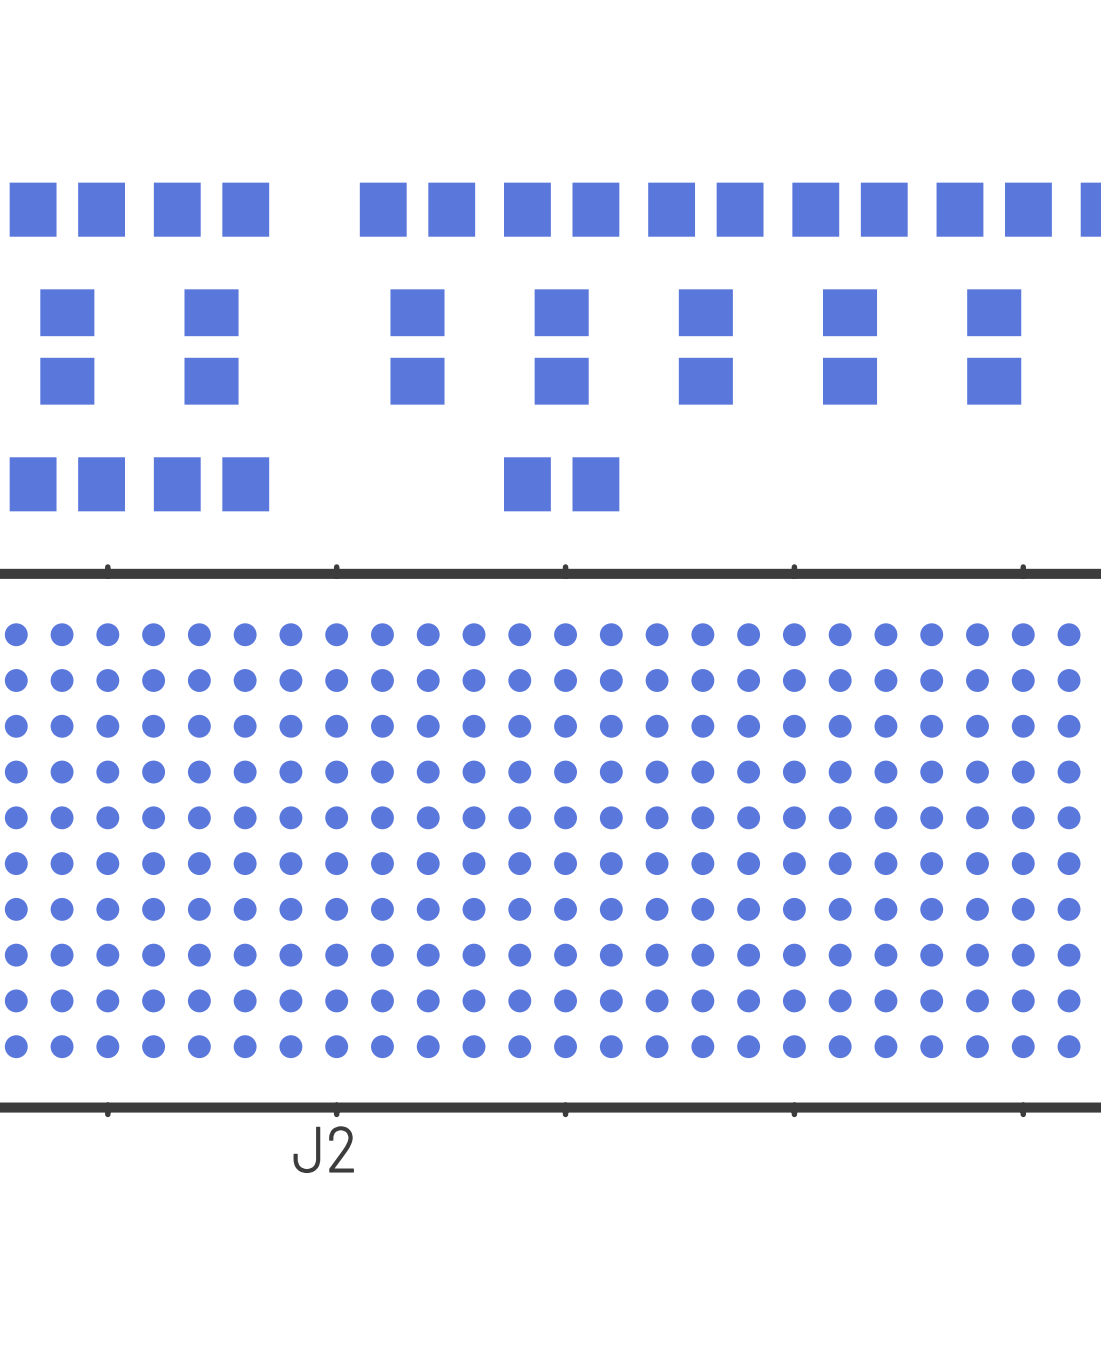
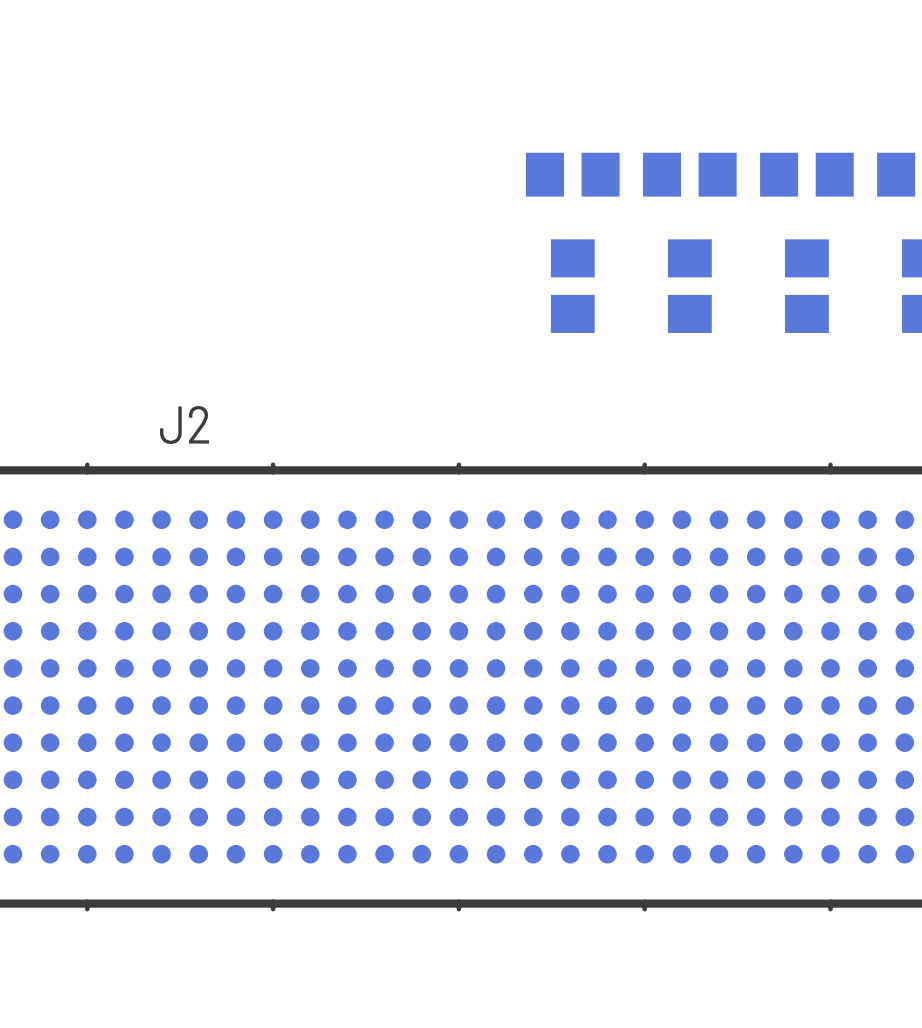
part: (67, 209) -> none
part: (211, 209) -> none
part: (417, 209) -> none
part: (561, 209) -> none
part: (67, 346) -> none
part: (211, 346) -> none
part: (417, 346) -> none
part: (561, 346) -> none
part: (67, 484) -> none
part: (211, 484) -> none
part: (561, 484) -> none
J2 name position: J2 (323, 1149) -> J2 (184, 425)

